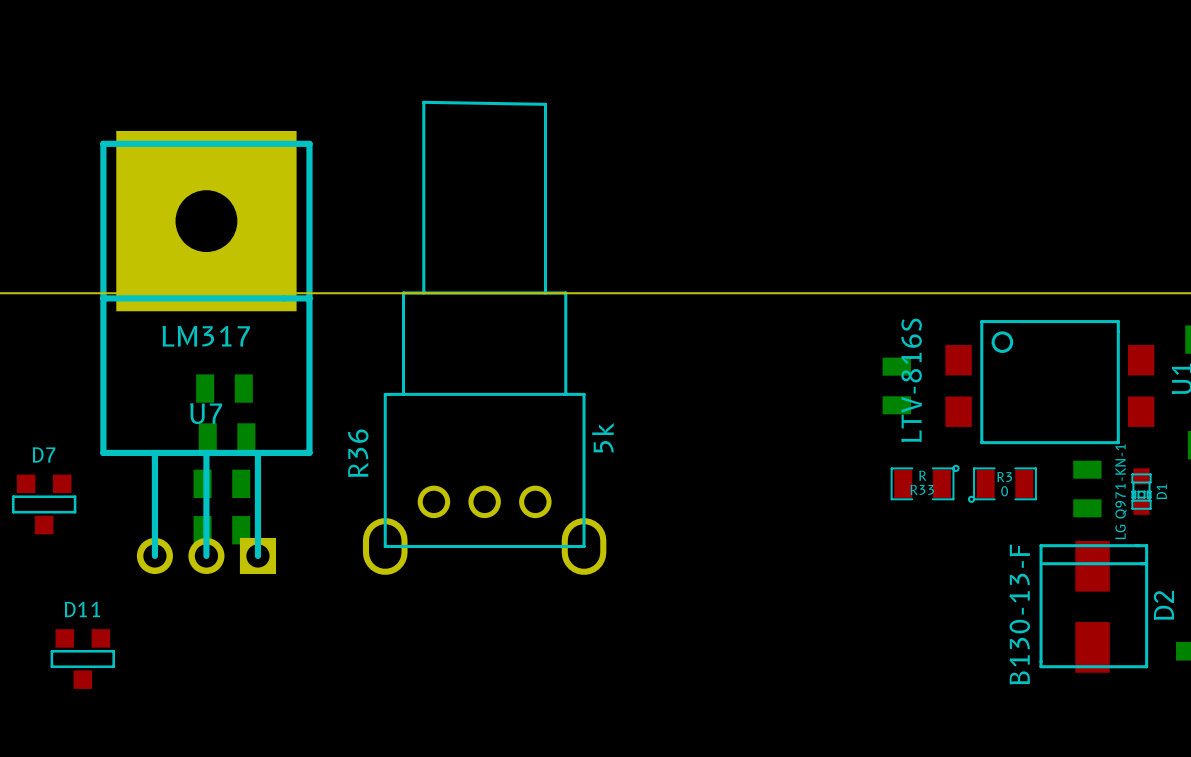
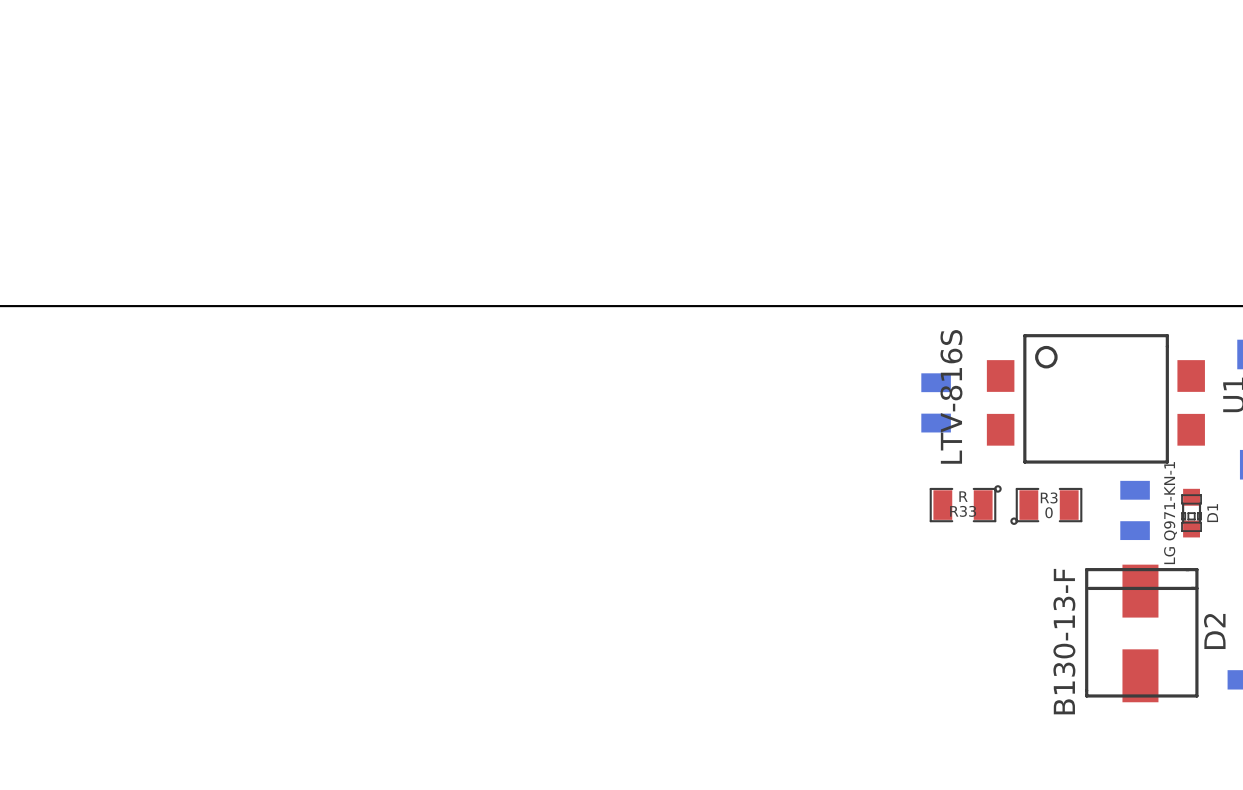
R36: 5k (484, 337) -> none
U7: LM317 (206, 352) -> none
part: (224, 388) -> none
part: (227, 437) -> none
part: (221, 483) -> none
D7: (44, 504) -> none
part: (221, 530) -> none
D11: (82, 659) -> none

